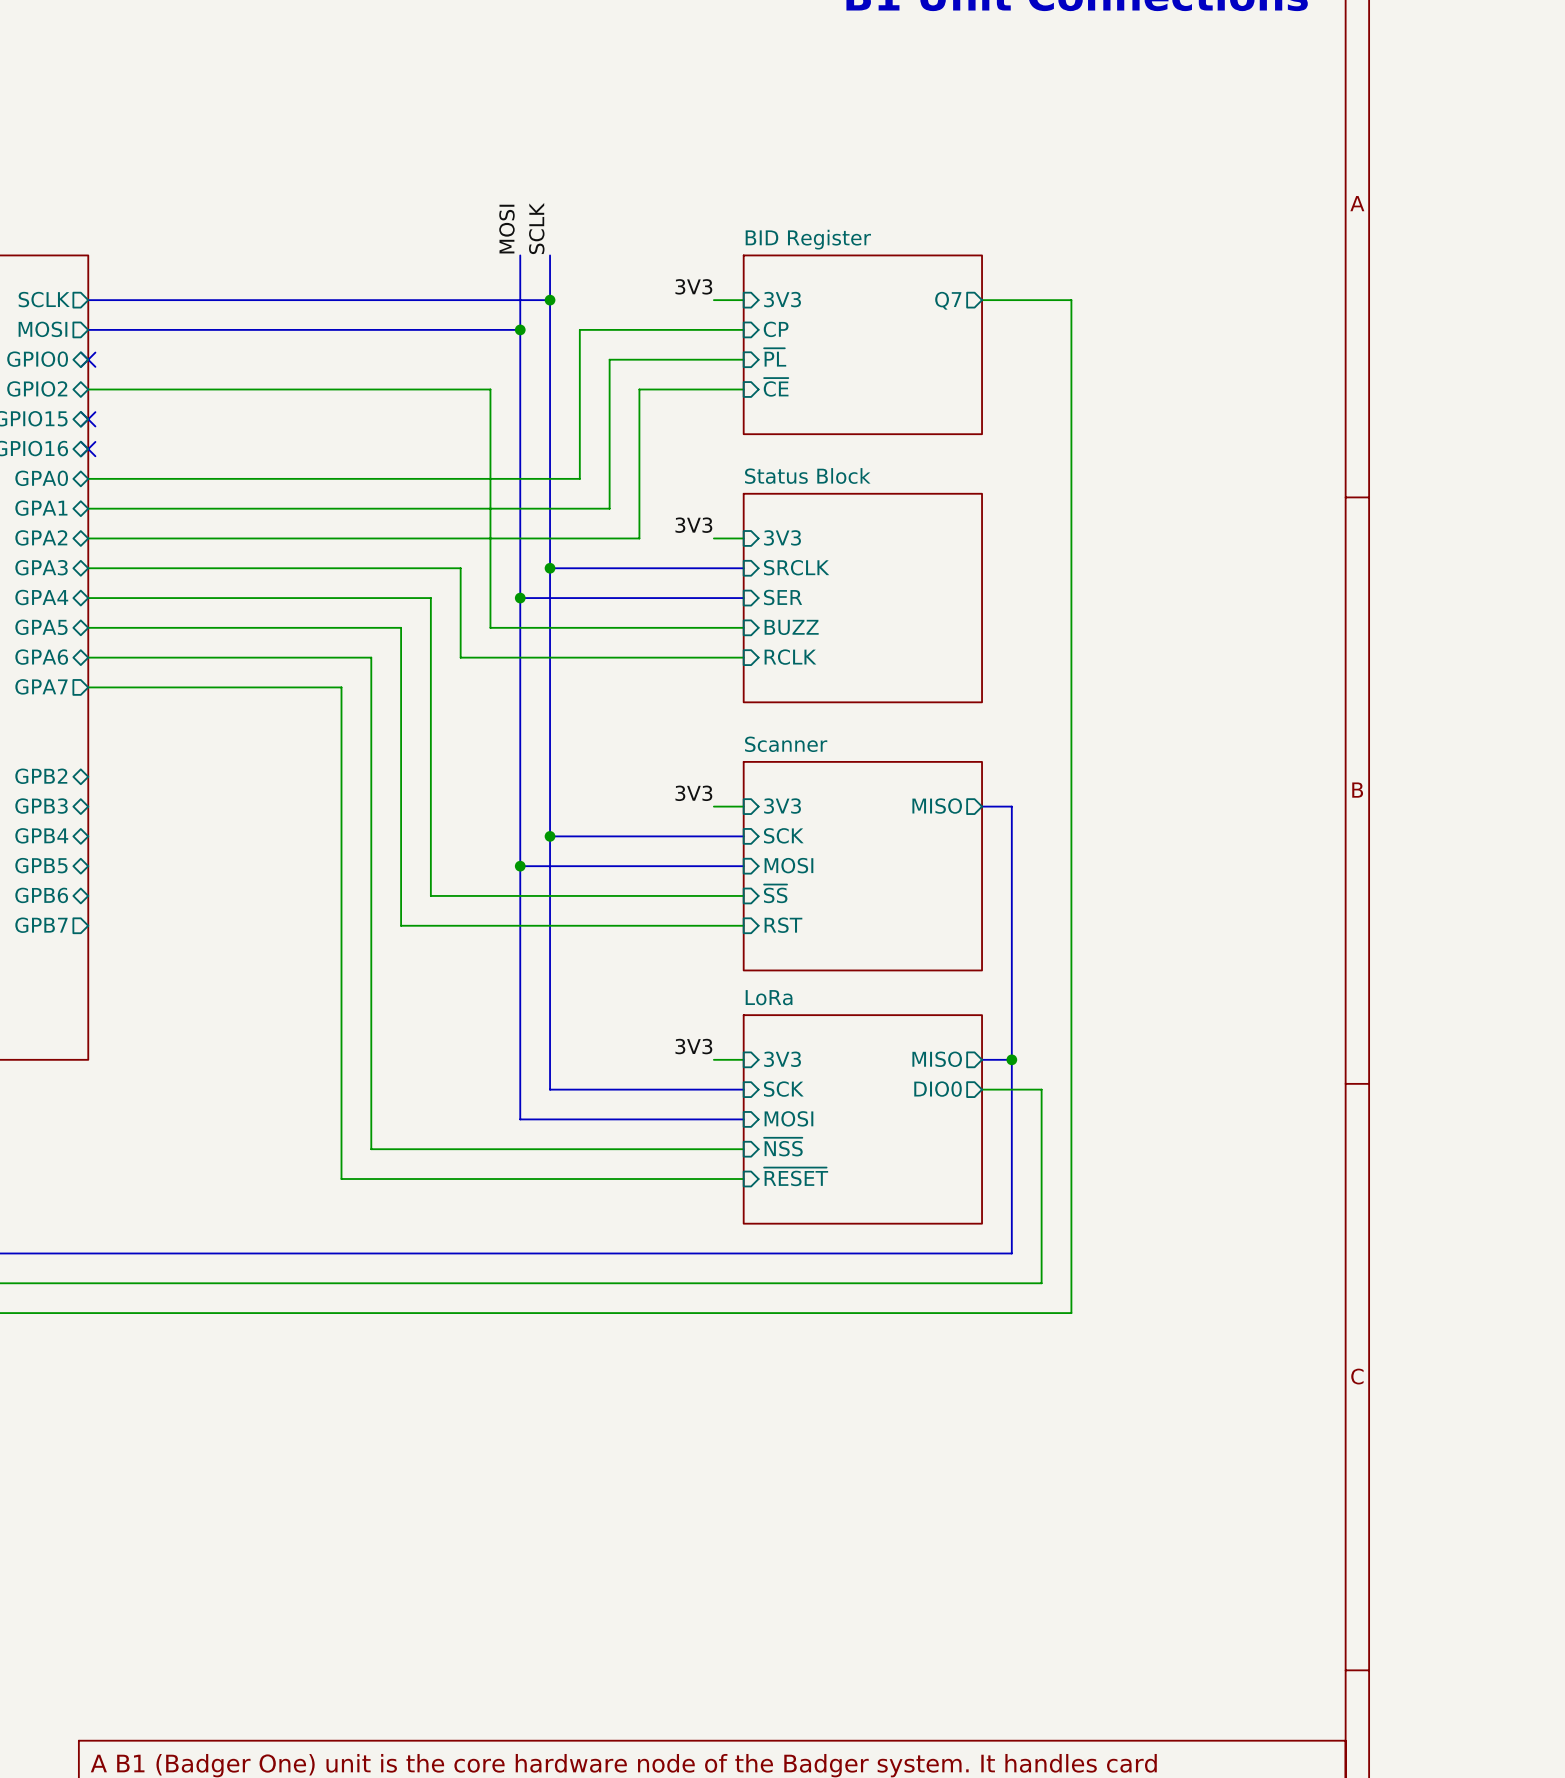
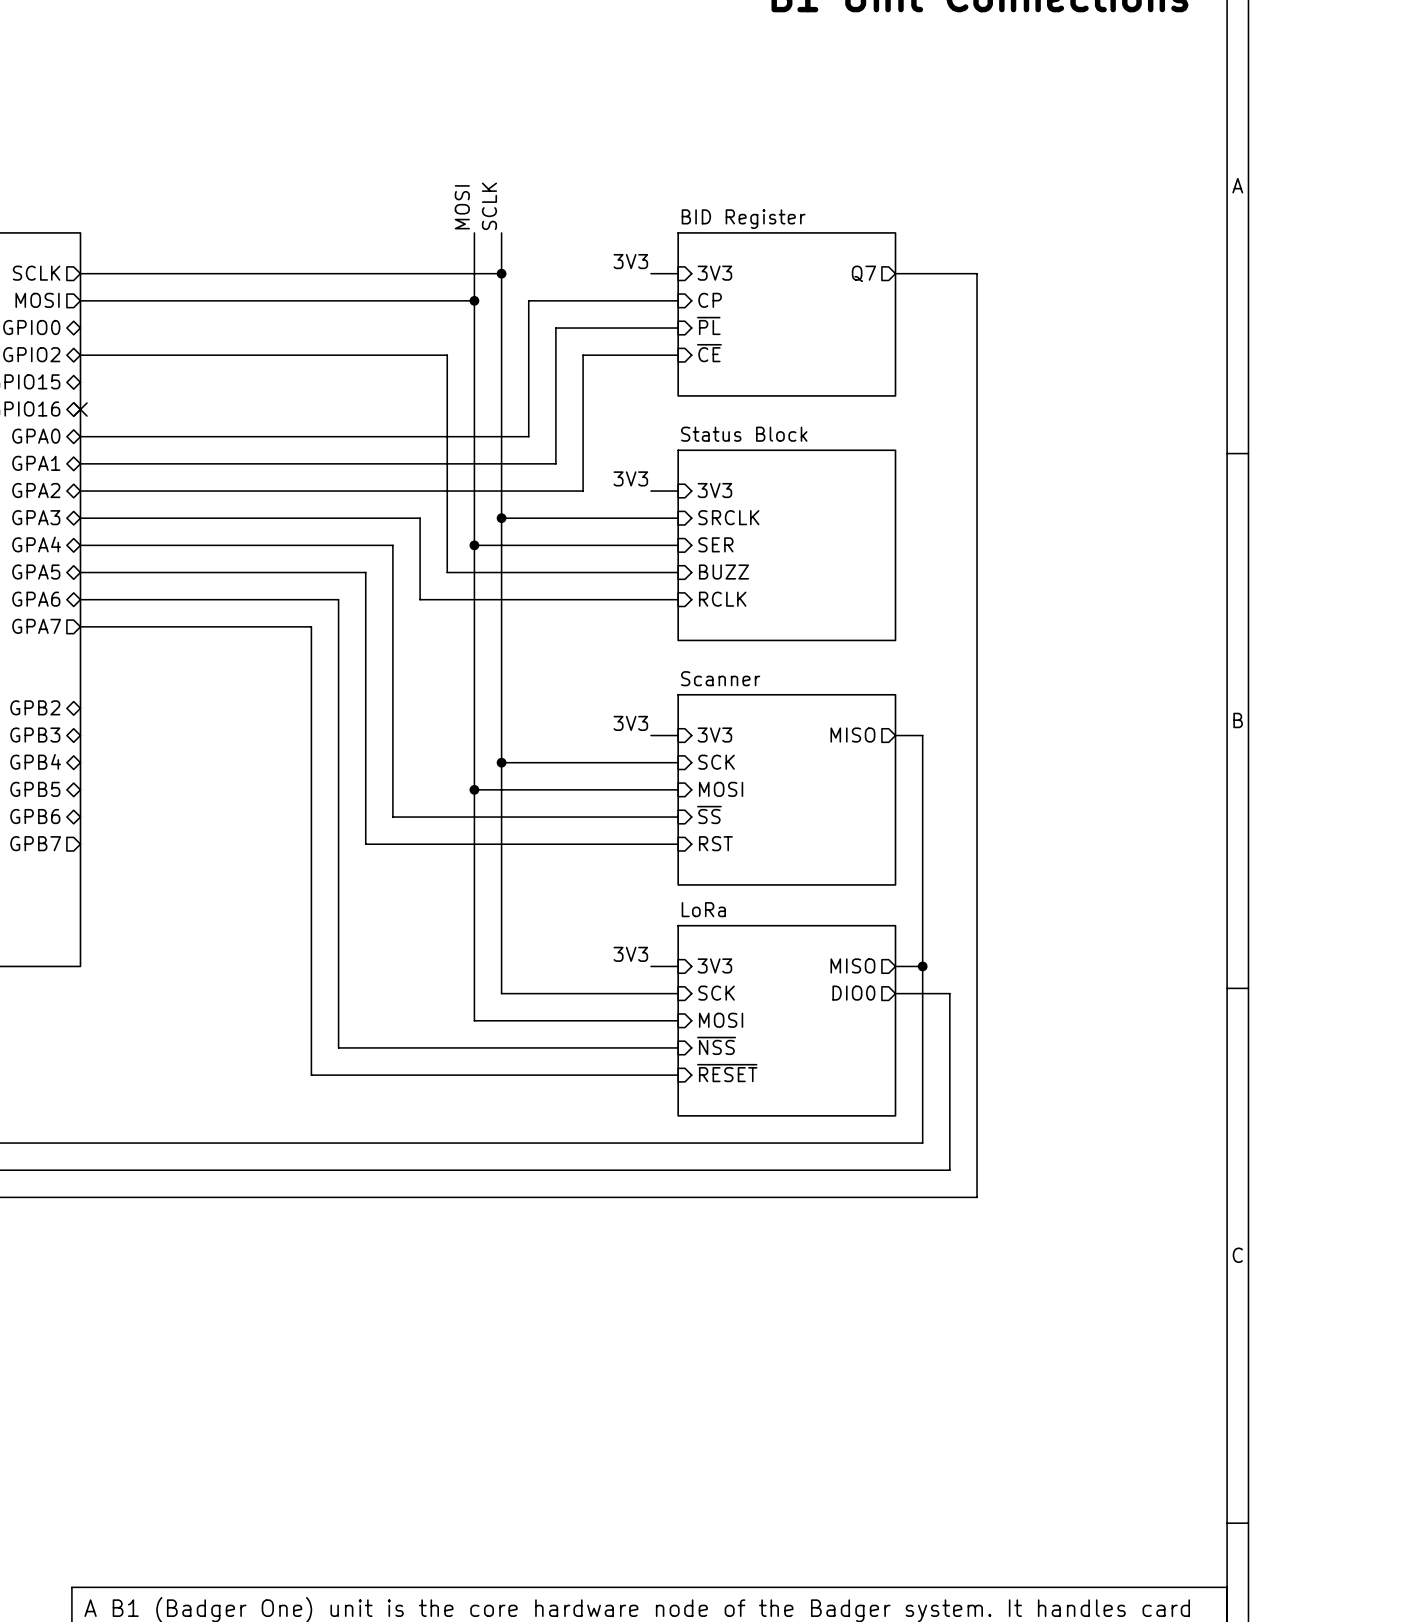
no-connect mark: (88, 359) -> none
no-connect mark: (88, 419) -> none

